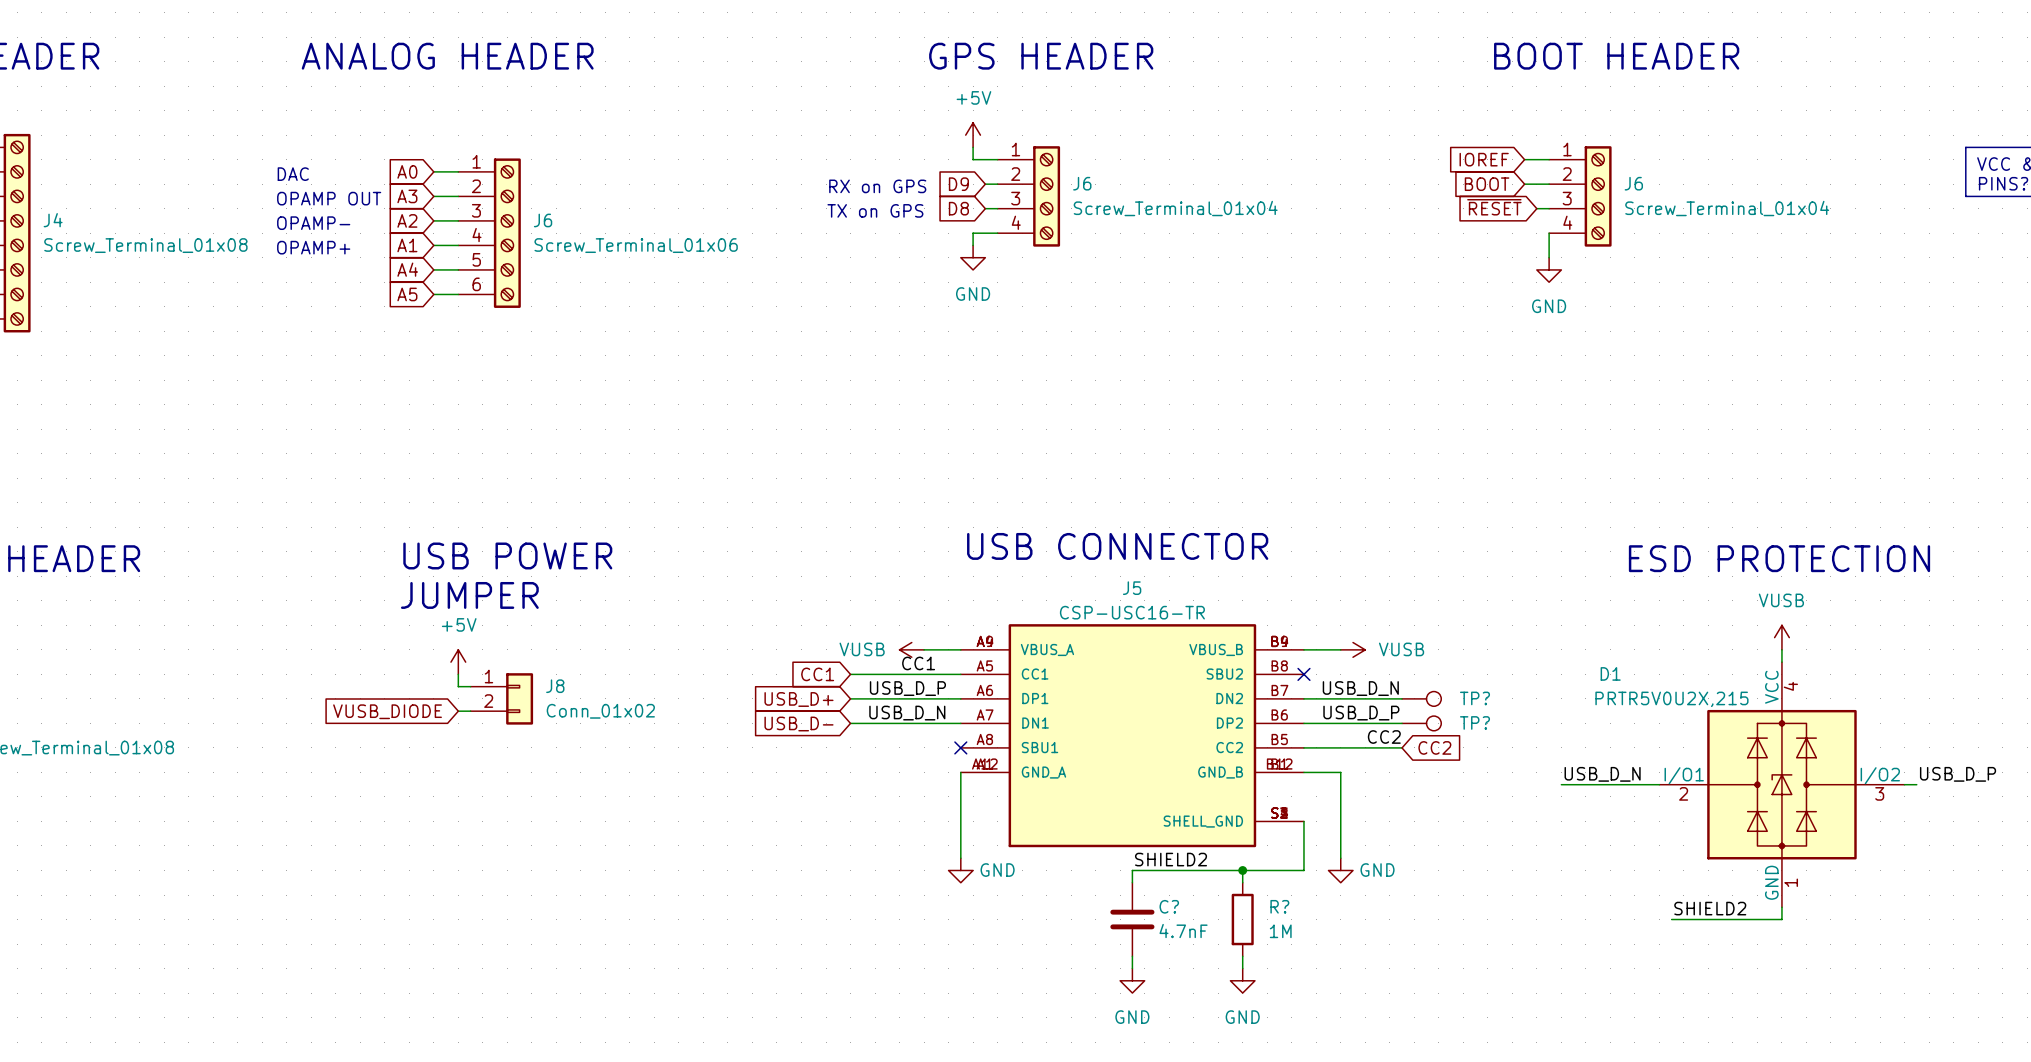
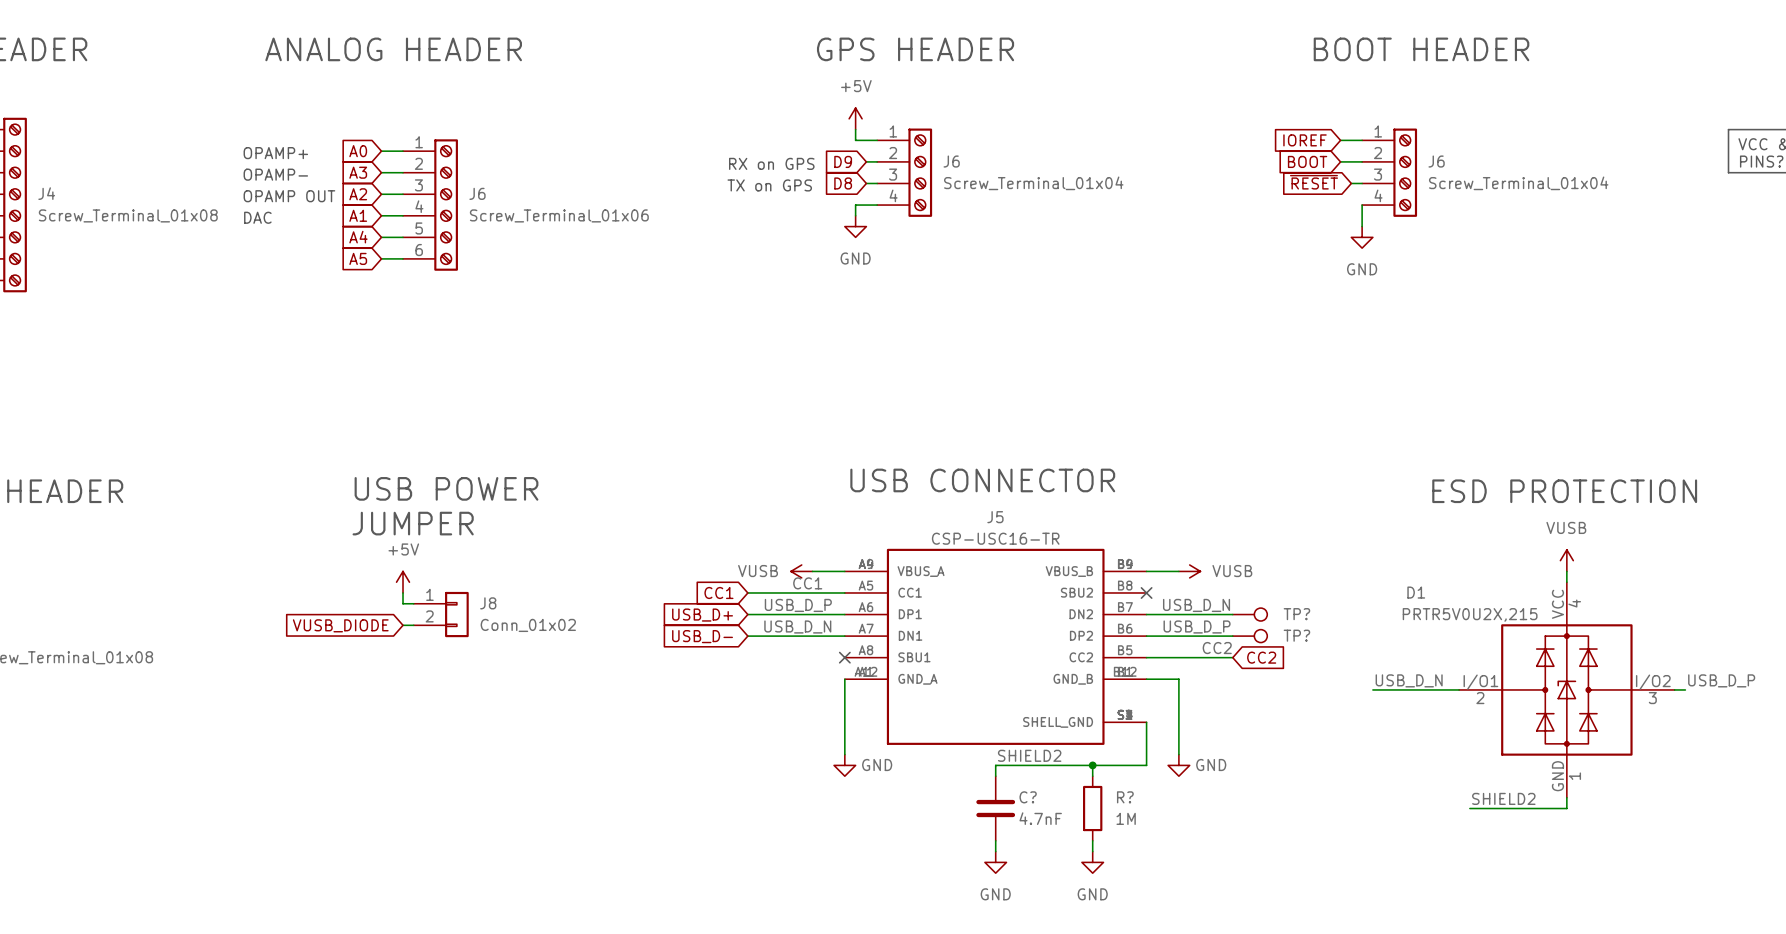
text: DAC (293, 174) -> OPAMP+ (275, 153)
text: OPAMP OUT (329, 198) -> OPAMP- (275, 174)
text: OPAMP- (313, 223) -> OPAMP OUT (289, 196)
text: OPAMP+ (313, 247) -> DAC (257, 217)

